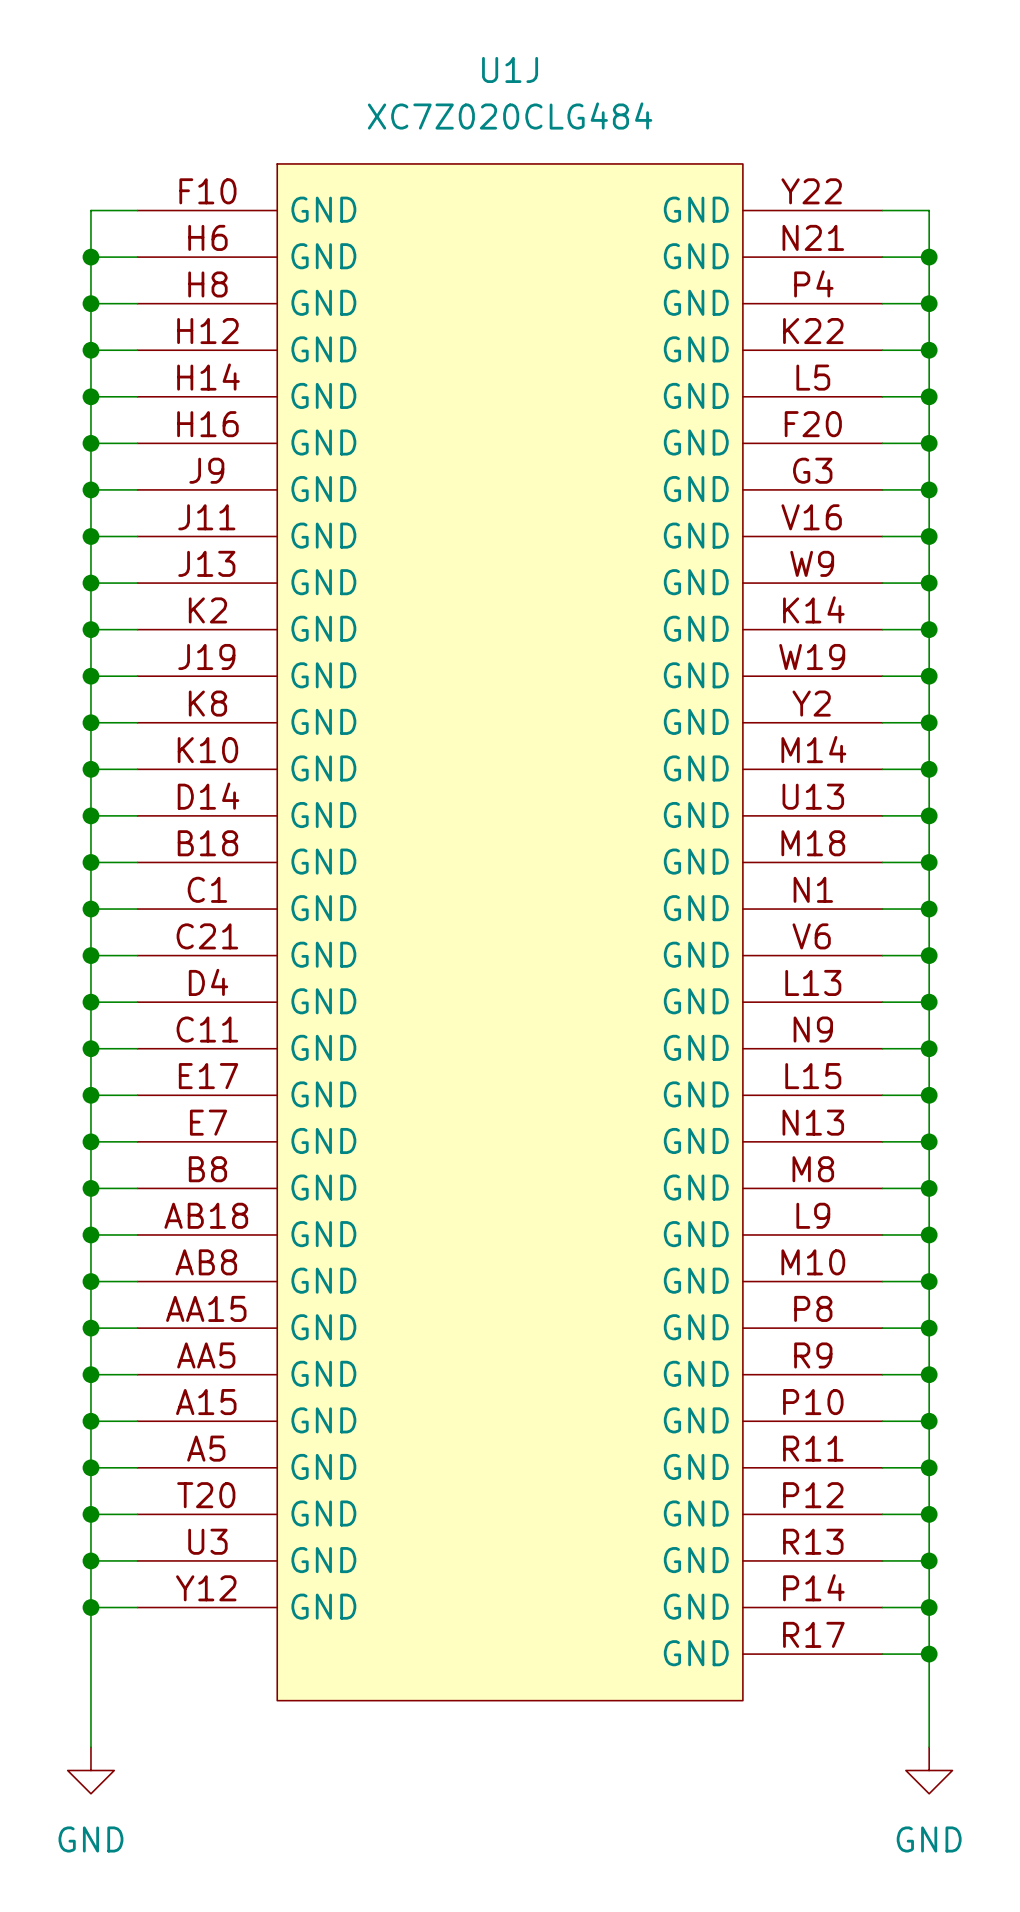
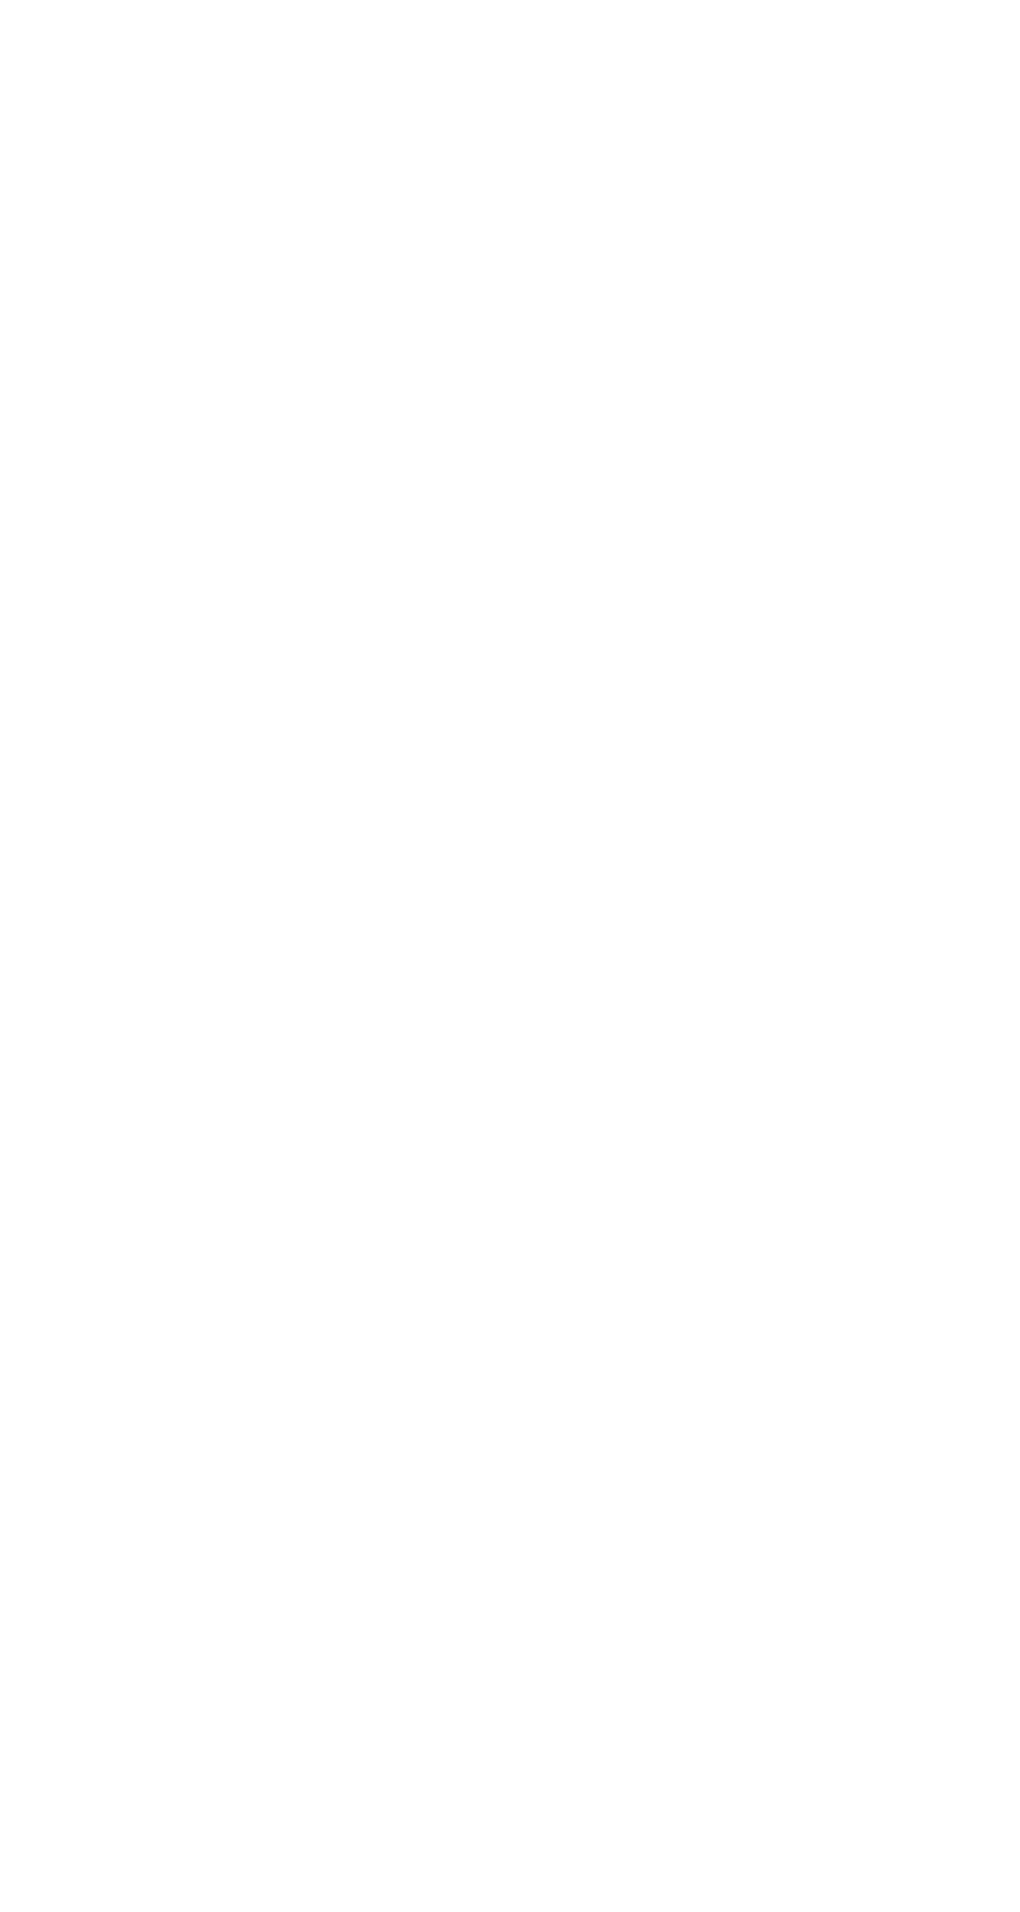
wire: (137, 210) (90, 210) (90, 1747) -> none
wire: (882, 210) (929, 210) (929, 1747) -> none
wire: (90, 257) (137, 257) -> none
junction: (90, 257) -> none
wire: (882, 257) (929, 257) -> none
junction: (929, 257) -> none
wire: (90, 303) (137, 303) -> none
junction: (90, 303) -> none
wire: (882, 303) (929, 303) -> none
junction: (929, 303) -> none
wire: (90, 350) (137, 350) -> none
junction: (90, 350) -> none
wire: (882, 350) (929, 350) -> none
junction: (929, 350) -> none
wire: (90, 396) (137, 396) -> none
junction: (90, 396) -> none
wire: (882, 396) (929, 396) -> none
junction: (929, 396) -> none
wire: (90, 443) (137, 443) -> none
junction: (90, 443) -> none
wire: (882, 443) (929, 443) -> none
junction: (929, 443) -> none
wire: (90, 489) (137, 489) -> none
junction: (90, 489) -> none
wire: (882, 489) (929, 489) -> none
junction: (929, 489) -> none
wire: (90, 536) (137, 536) -> none
junction: (90, 536) -> none
wire: (882, 536) (929, 536) -> none
junction: (929, 536) -> none
wire: (90, 583) (137, 583) -> none
junction: (90, 583) -> none
wire: (882, 583) (929, 583) -> none
junction: (929, 583) -> none
wire: (90, 629) (137, 629) -> none
junction: (90, 629) -> none
wire: (882, 629) (929, 629) -> none
junction: (929, 629) -> none
wire: (90, 676) (137, 676) -> none
junction: (90, 676) -> none
wire: (882, 676) (929, 676) -> none
junction: (929, 676) -> none
wire: (90, 722) (137, 722) -> none
junction: (90, 722) -> none
wire: (882, 722) (929, 722) -> none
junction: (929, 722) -> none
wire: (90, 769) (137, 769) -> none
junction: (90, 769) -> none
wire: (882, 769) (929, 769) -> none
junction: (929, 769) -> none
wire: (90, 815) (137, 815) -> none
junction: (90, 815) -> none
wire: (882, 815) (929, 815) -> none
junction: (929, 815) -> none
wire: (90, 862) (137, 862) -> none
junction: (90, 862) -> none
wire: (882, 862) (929, 862) -> none
junction: (929, 862) -> none
wire: (90, 909) (137, 909) -> none
junction: (90, 909) -> none
wire: (882, 909) (929, 909) -> none
junction: (929, 909) -> none
U1J: XC7Z020CLG484 (510, 932) -> none
wire: (90, 955) (137, 955) -> none
junction: (90, 955) -> none
wire: (882, 955) (929, 955) -> none
junction: (929, 955) -> none
wire: (90, 1002) (137, 1002) -> none
junction: (90, 1002) -> none
wire: (882, 1002) (929, 1002) -> none
junction: (929, 1002) -> none
wire: (90, 1048) (137, 1048) -> none
junction: (90, 1048) -> none
wire: (882, 1048) (929, 1048) -> none
junction: (929, 1048) -> none
wire: (90, 1095) (137, 1095) -> none
junction: (90, 1095) -> none
wire: (882, 1095) (929, 1095) -> none
junction: (929, 1095) -> none
wire: (90, 1141) (137, 1141) -> none
junction: (90, 1141) -> none
wire: (882, 1141) (929, 1141) -> none
junction: (929, 1141) -> none
wire: (90, 1188) (137, 1188) -> none
junction: (90, 1188) -> none
wire: (882, 1188) (929, 1188) -> none
junction: (929, 1188) -> none
wire: (90, 1234) (137, 1234) -> none
junction: (90, 1234) -> none
wire: (882, 1234) (929, 1234) -> none
junction: (929, 1234) -> none
wire: (90, 1281) (137, 1281) -> none
junction: (90, 1281) -> none
wire: (882, 1281) (929, 1281) -> none
junction: (929, 1281) -> none
wire: (90, 1328) (137, 1328) -> none
junction: (90, 1328) -> none
wire: (882, 1328) (929, 1328) -> none
junction: (929, 1328) -> none
wire: (90, 1374) (137, 1374) -> none
junction: (90, 1374) -> none
wire: (882, 1374) (929, 1374) -> none
junction: (929, 1374) -> none
wire: (90, 1421) (137, 1421) -> none
junction: (90, 1421) -> none
wire: (882, 1421) (929, 1421) -> none
junction: (929, 1421) -> none
wire: (90, 1467) (137, 1467) -> none
junction: (90, 1467) -> none
wire: (882, 1467) (929, 1467) -> none
junction: (929, 1467) -> none
wire: (90, 1514) (137, 1514) -> none
junction: (90, 1514) -> none
wire: (882, 1514) (929, 1514) -> none
junction: (929, 1514) -> none
wire: (90, 1560) (137, 1560) -> none
junction: (90, 1560) -> none
wire: (882, 1560) (929, 1560) -> none
junction: (929, 1560) -> none
wire: (90, 1607) (137, 1607) -> none
junction: (90, 1607) -> none
wire: (882, 1607) (929, 1607) -> none
junction: (929, 1607) -> none
wire: (882, 1654) (929, 1654) -> none
junction: (929, 1654) -> none
power symbol: GND (90, 1770) -> none
power symbol: GND (929, 1770) -> none

